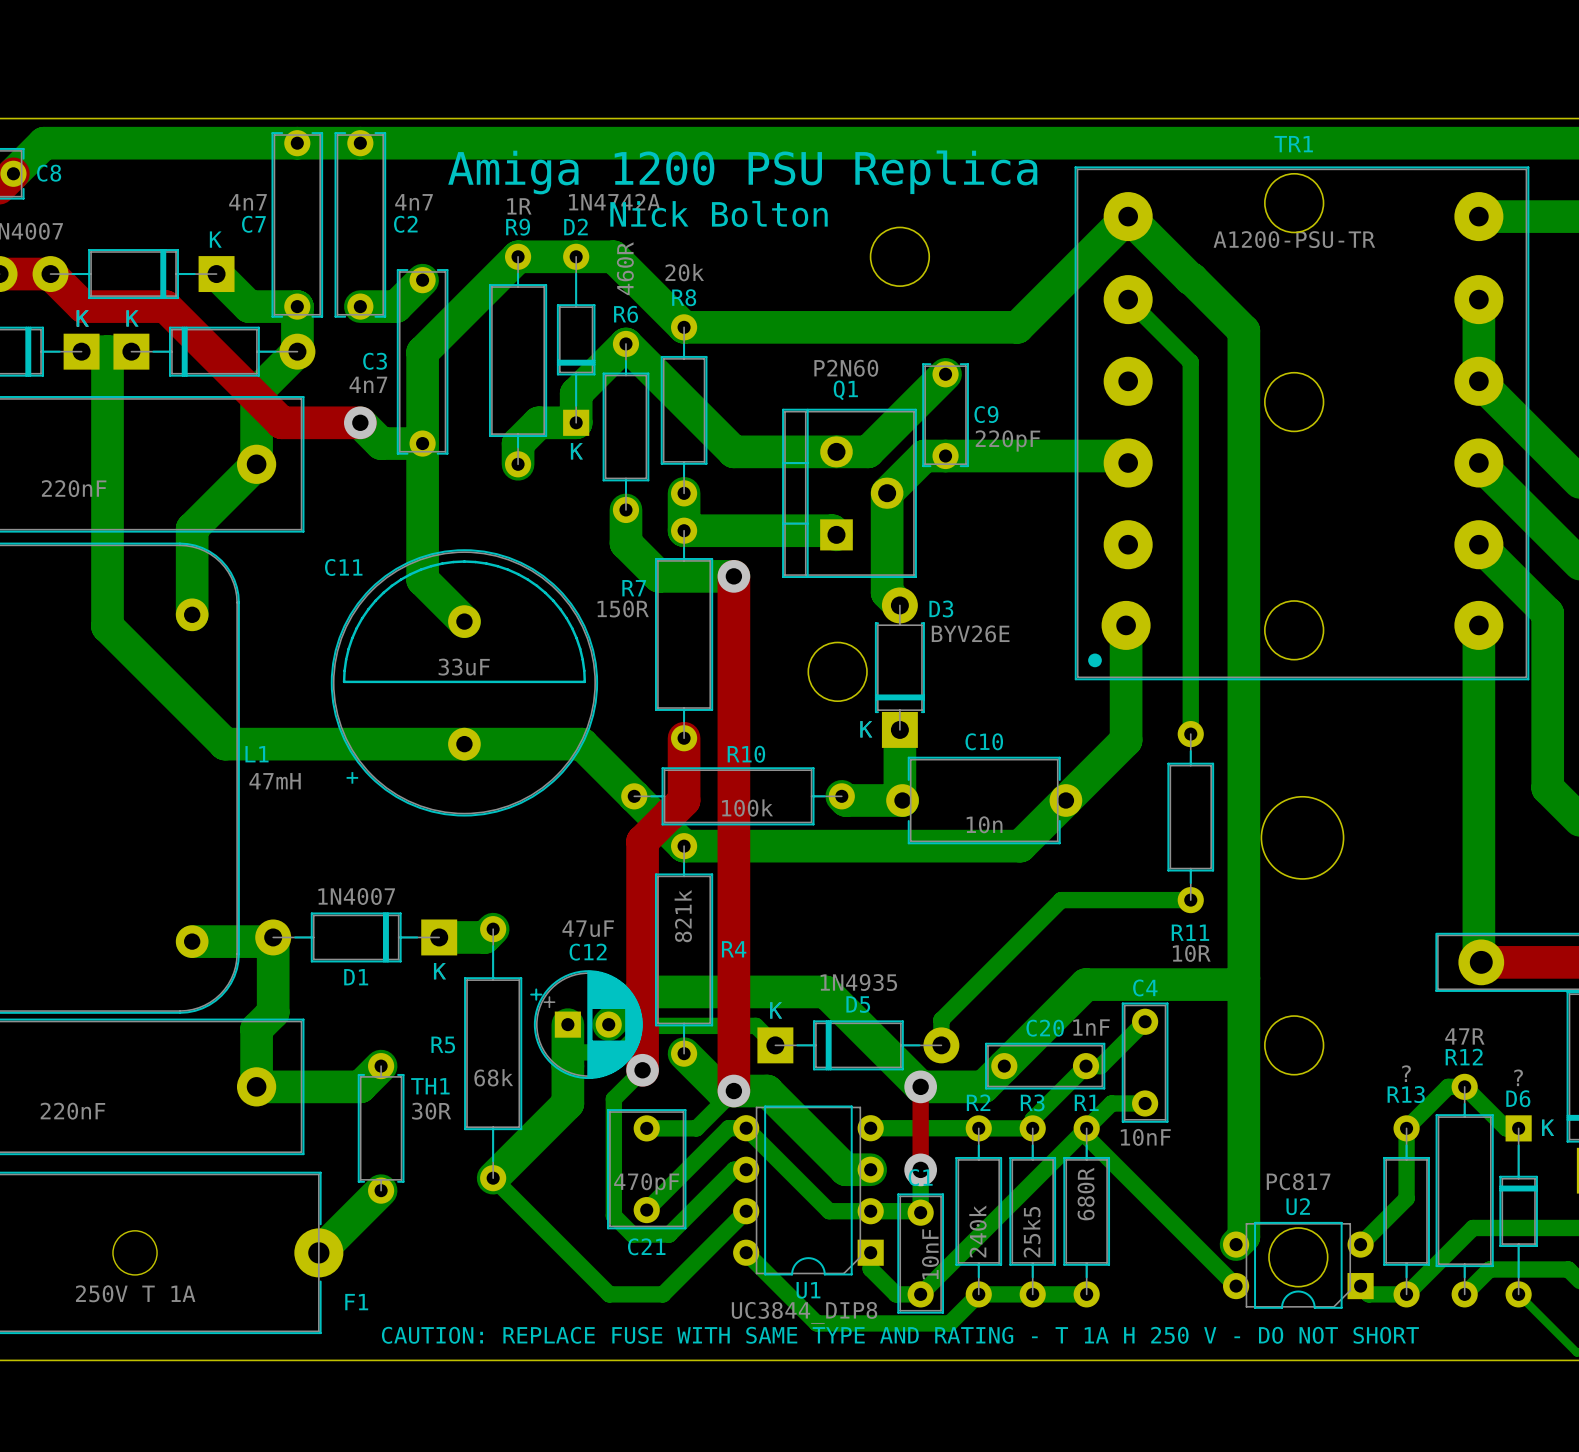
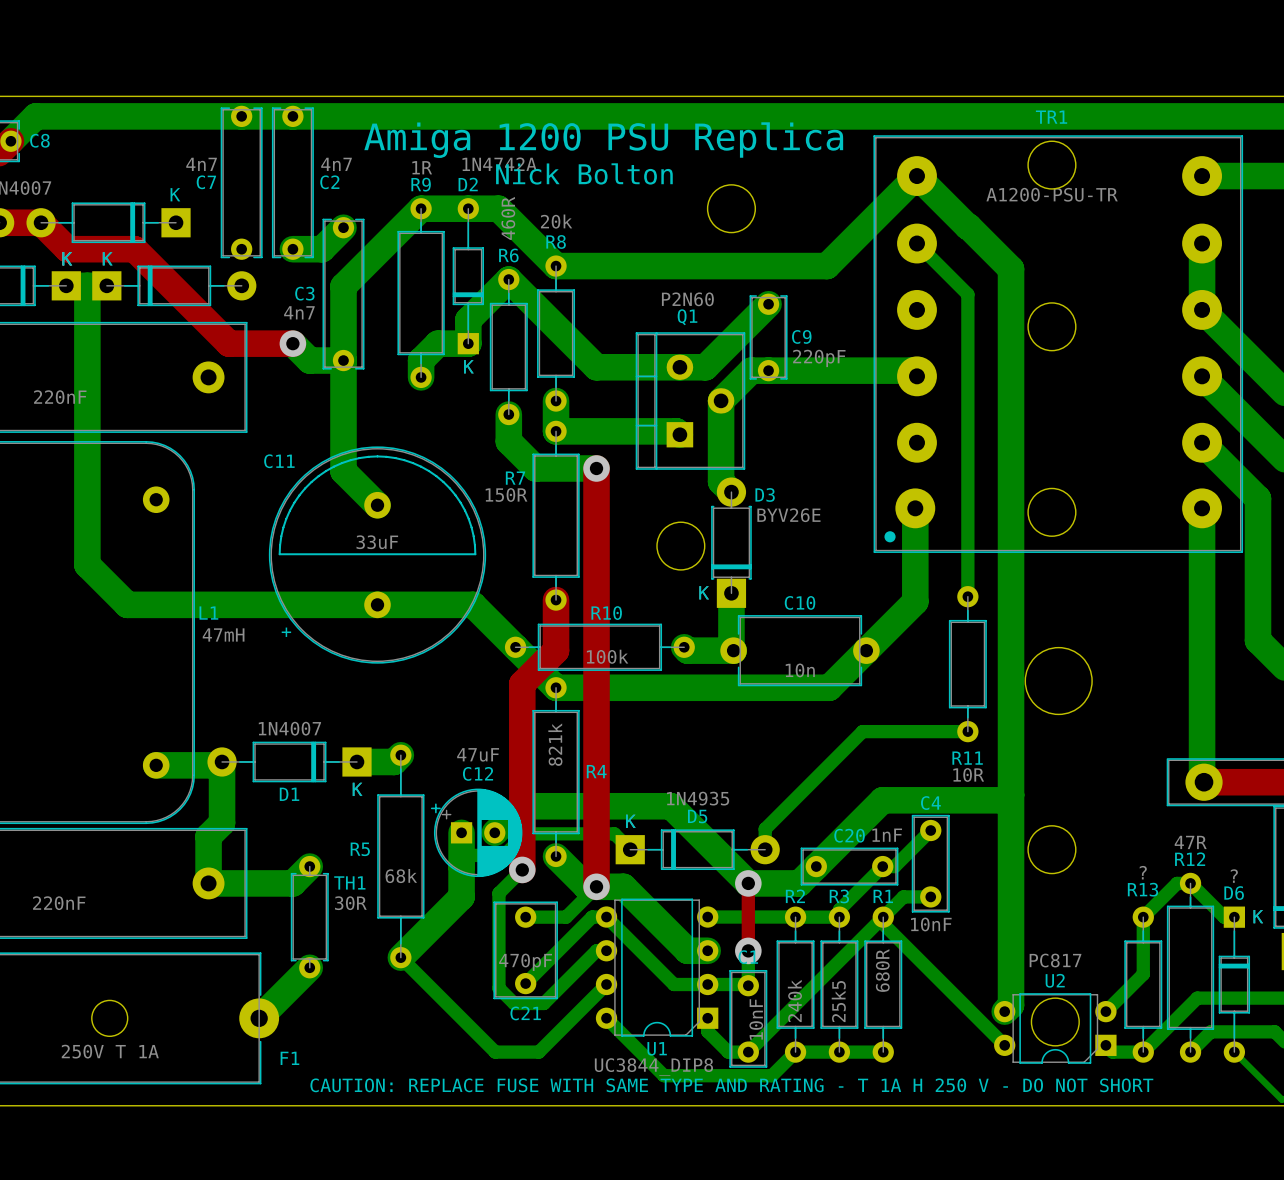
bottom track: (216, 274) (249, 306) (297, 306) -> none
bottom track: (297, 306) (297, 351) (256, 392) (256, 464) (192, 528) (192, 614) -> none
bottom track: (107, 626) (225, 744) -> (87, 509) (87, 564) (127, 604) (182, 604)

